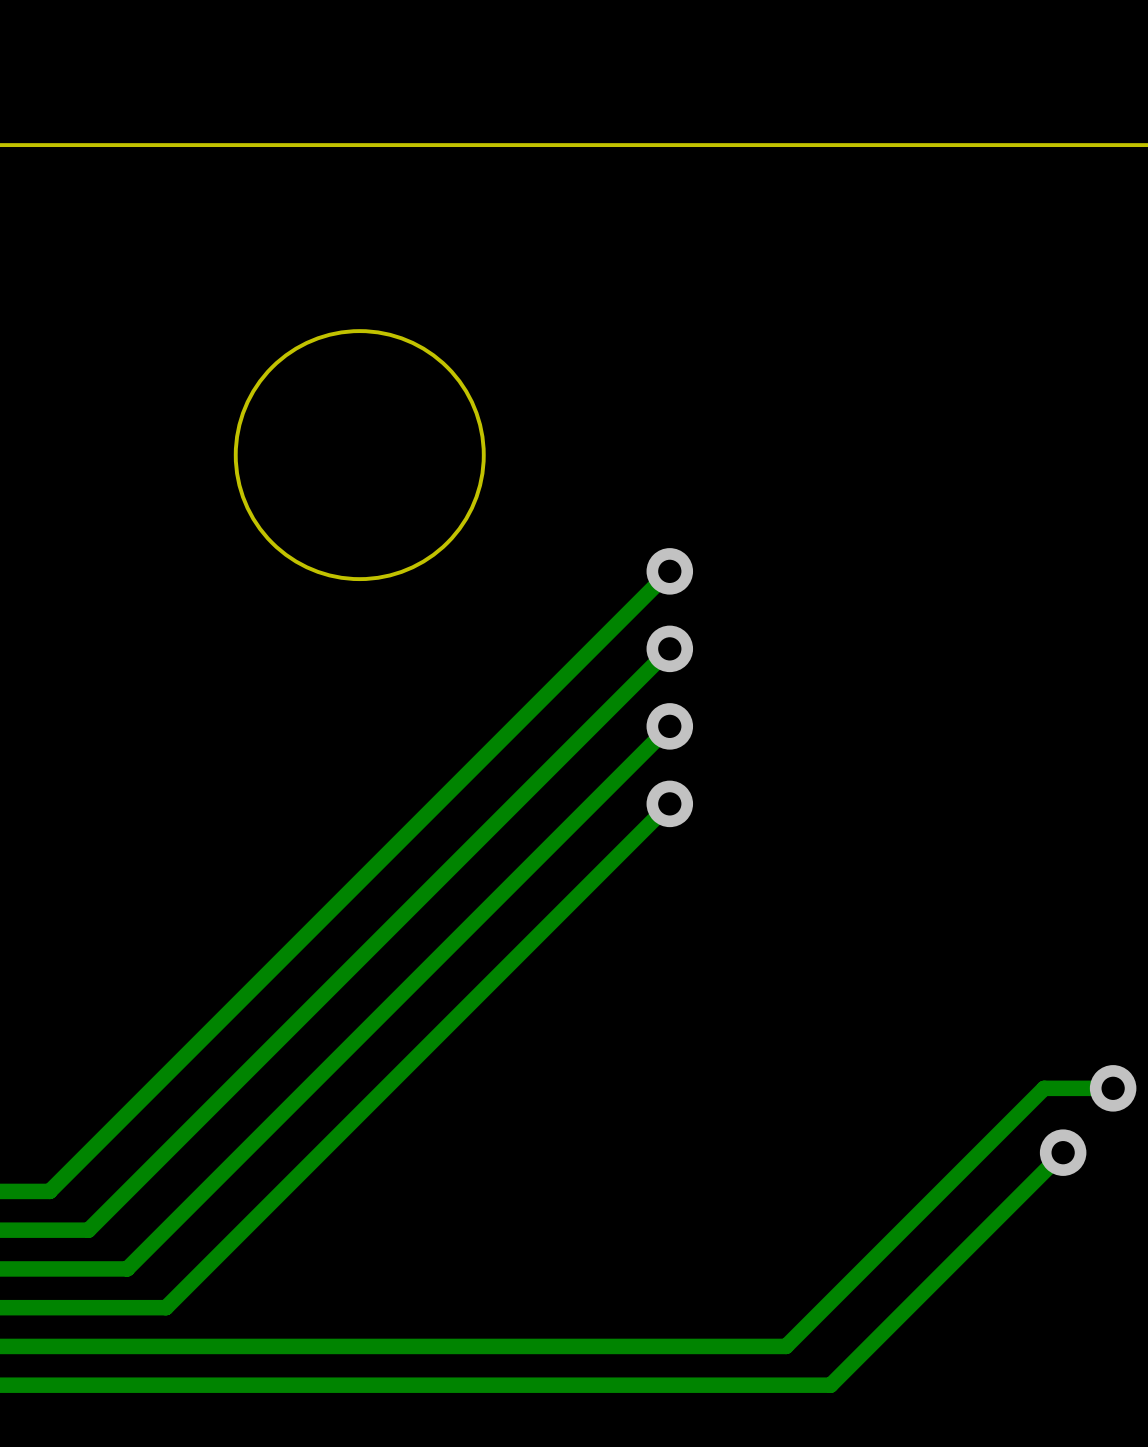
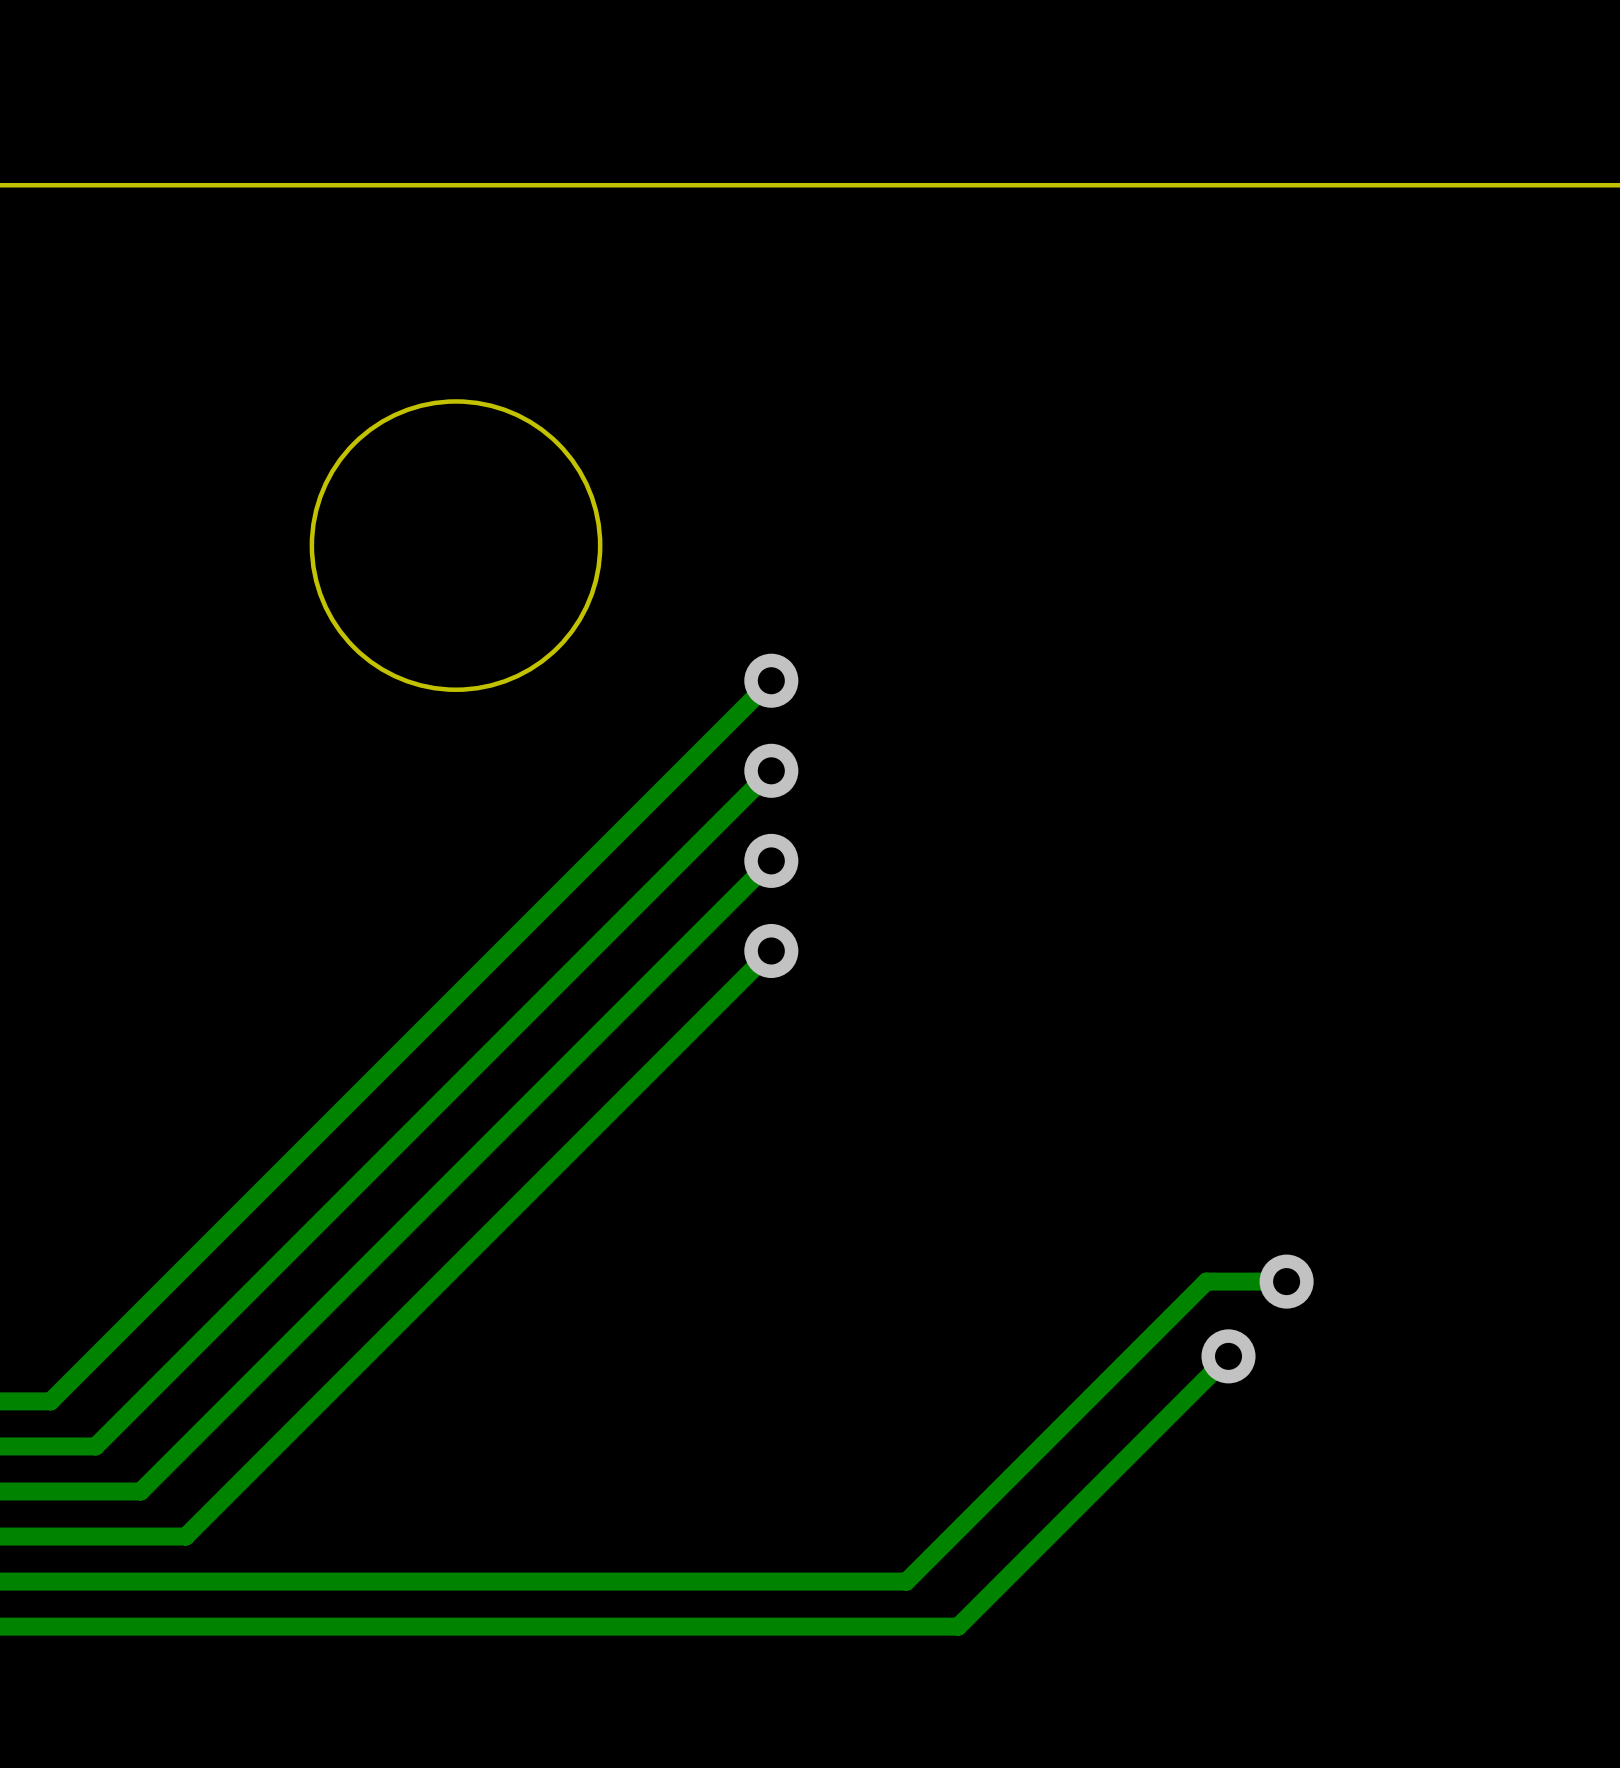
round board edge position: (359, 455) -> (456, 545)

